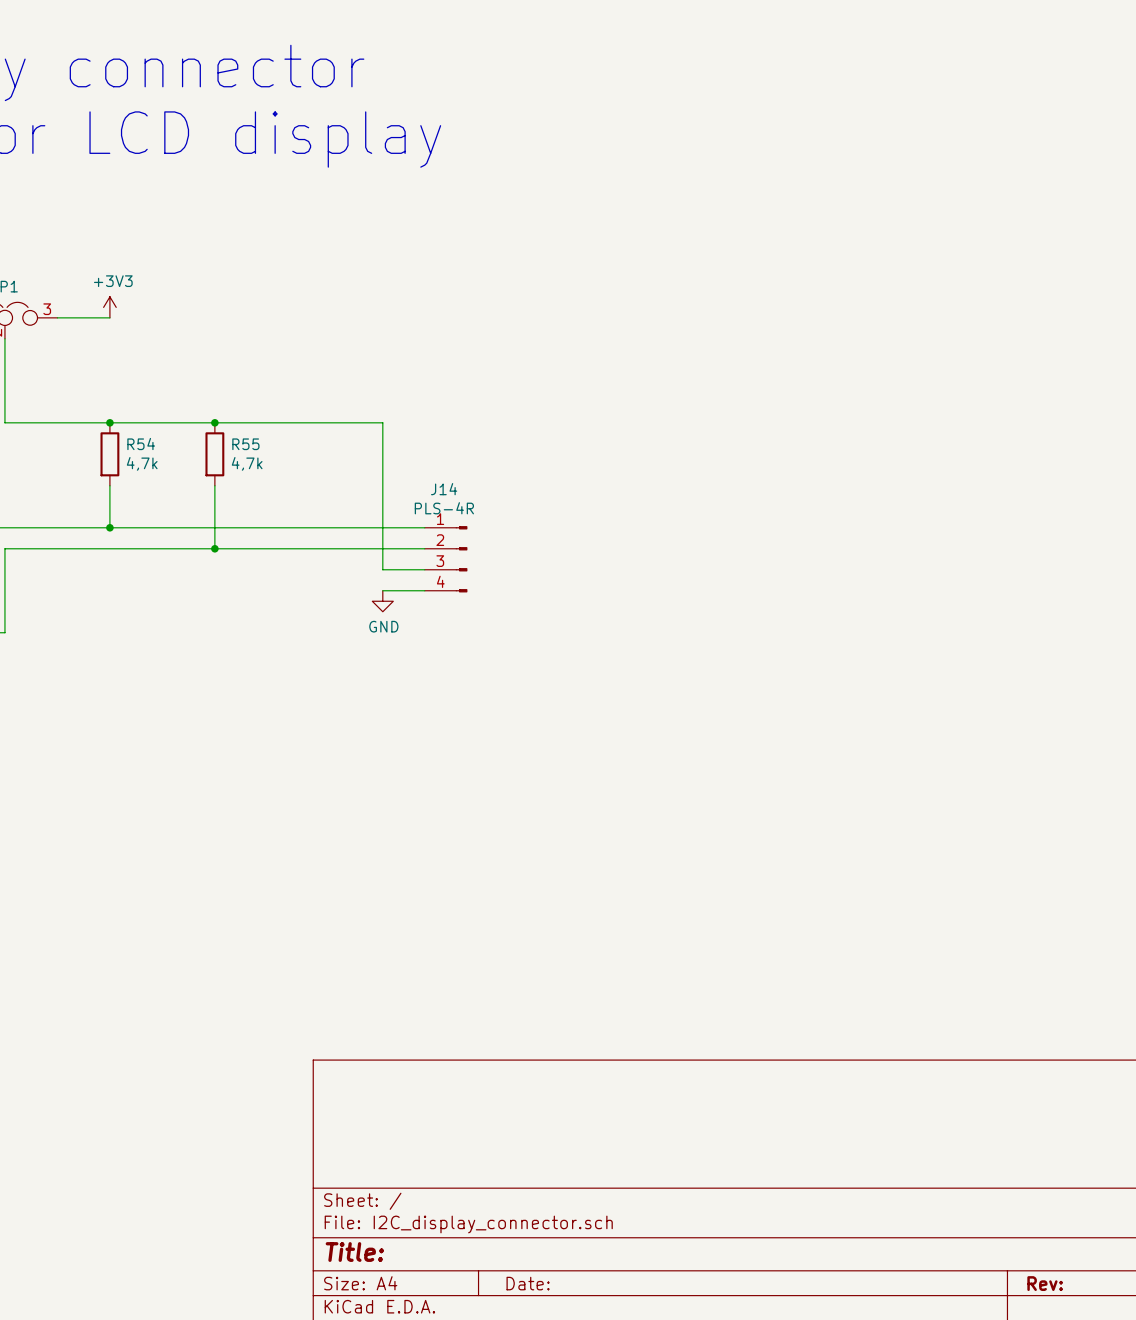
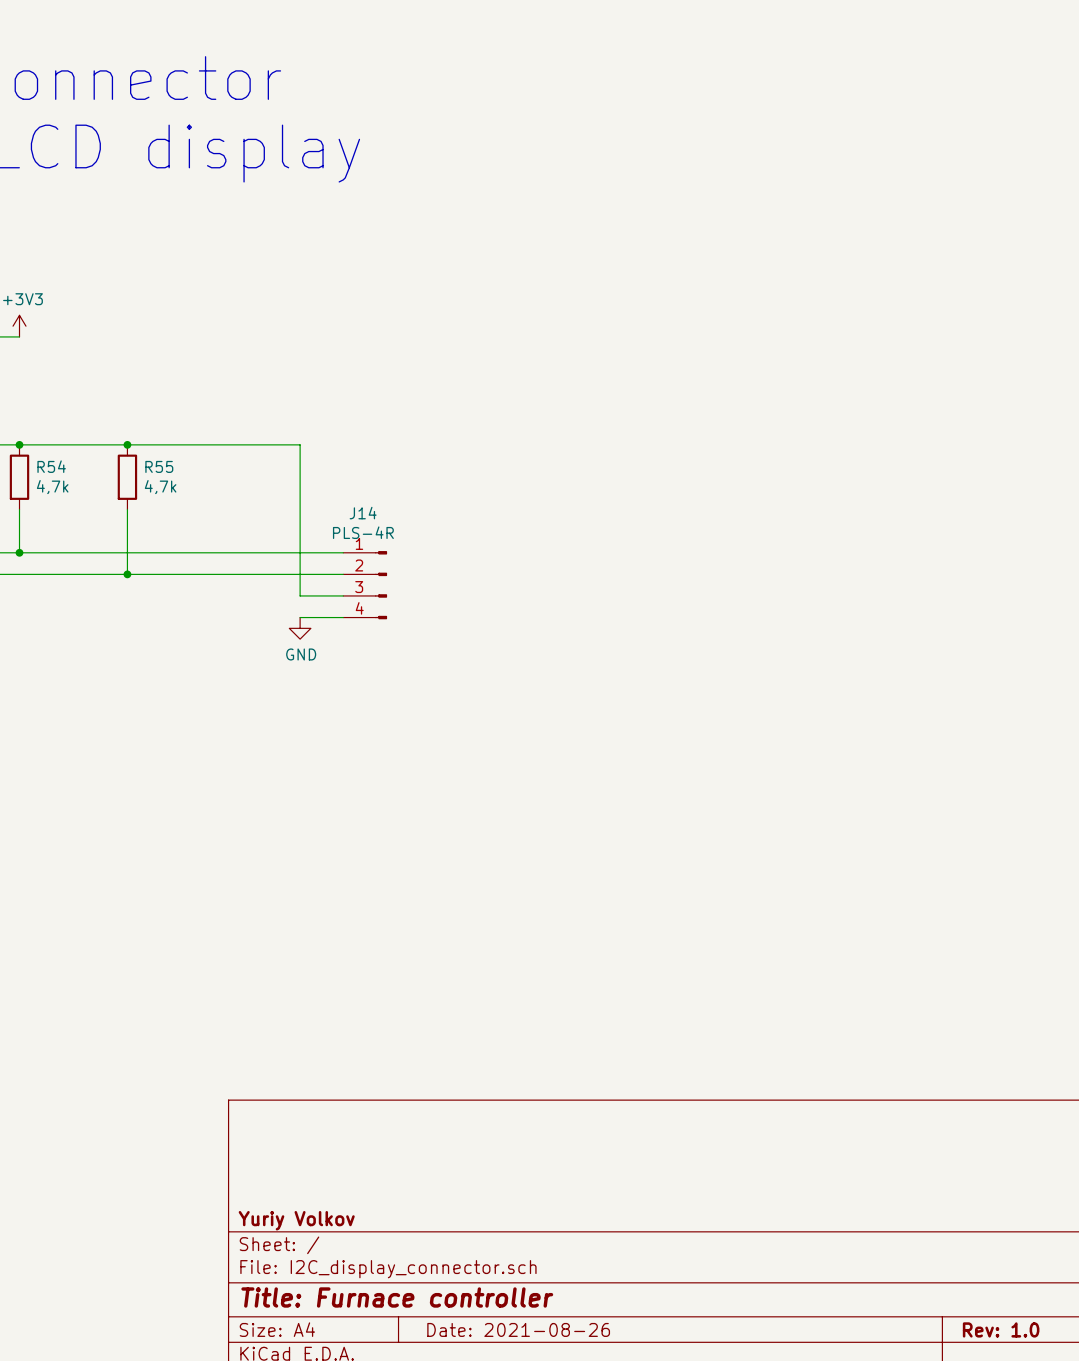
title block: none -> Yuriy Volkov (296, 1220)
title block: Title: (354, 1252) -> Title: Furnace controller (397, 1297)
title block: Date: (528, 1283) -> Date: 2021-08-26 (518, 1329)
title block: Rev: (1045, 1283) -> Rev: 1.0 (1001, 1329)

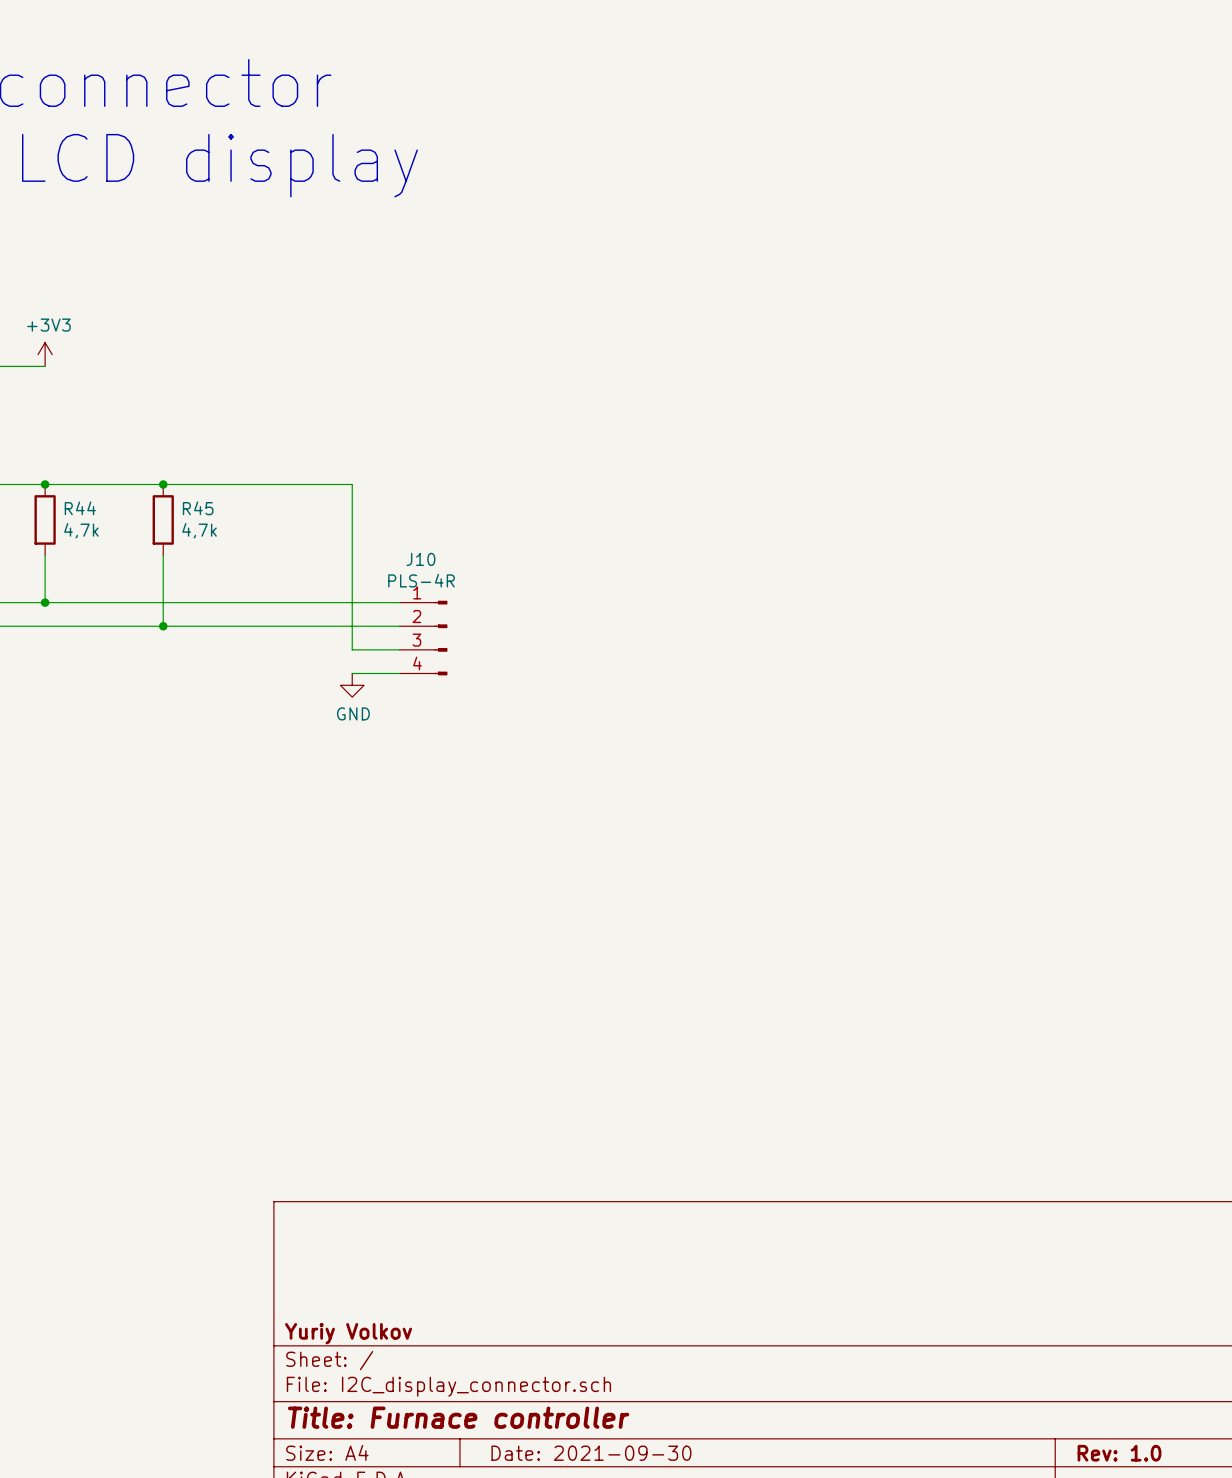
R54 name: R54 (51, 466) -> R44 (80, 508)
R55 name: R55 (159, 466) -> R45 (198, 508)
J14 name: J14 (363, 513) -> J10 (420, 559)
title block: Date: 2021-08-26 (518, 1329) -> Date: 2021-09-30 (591, 1453)

